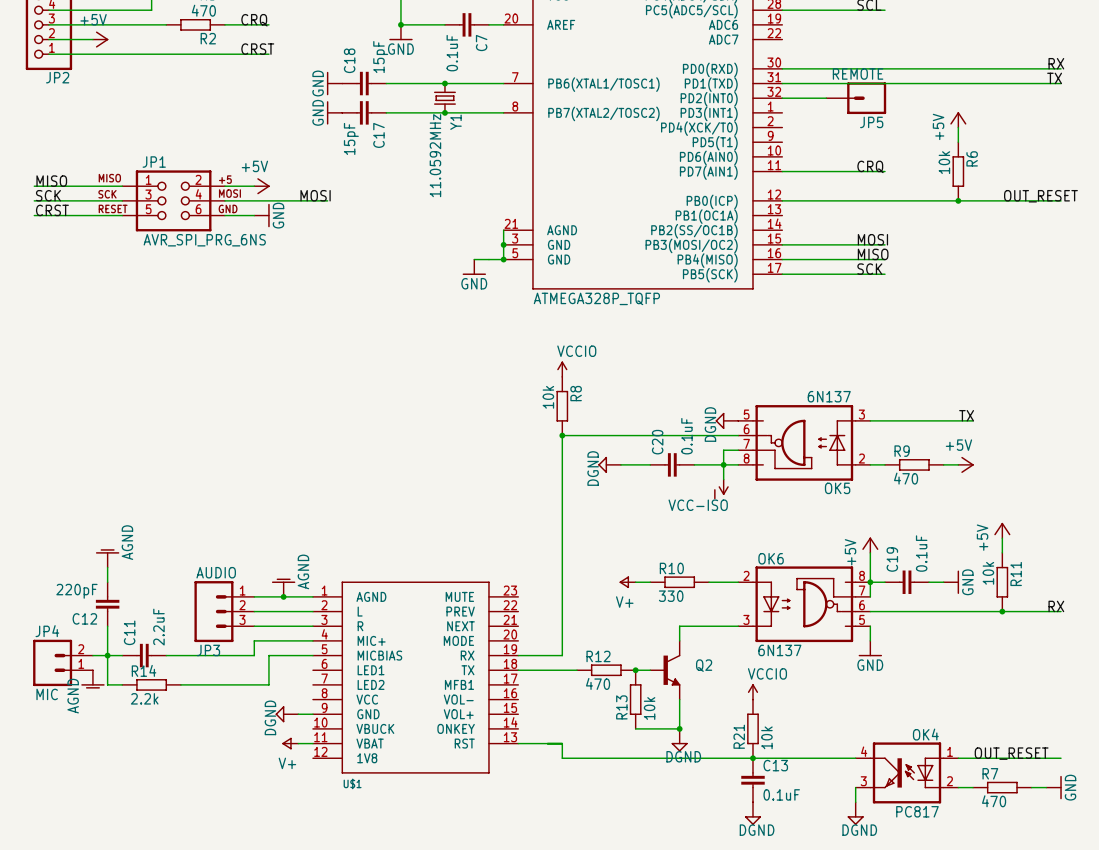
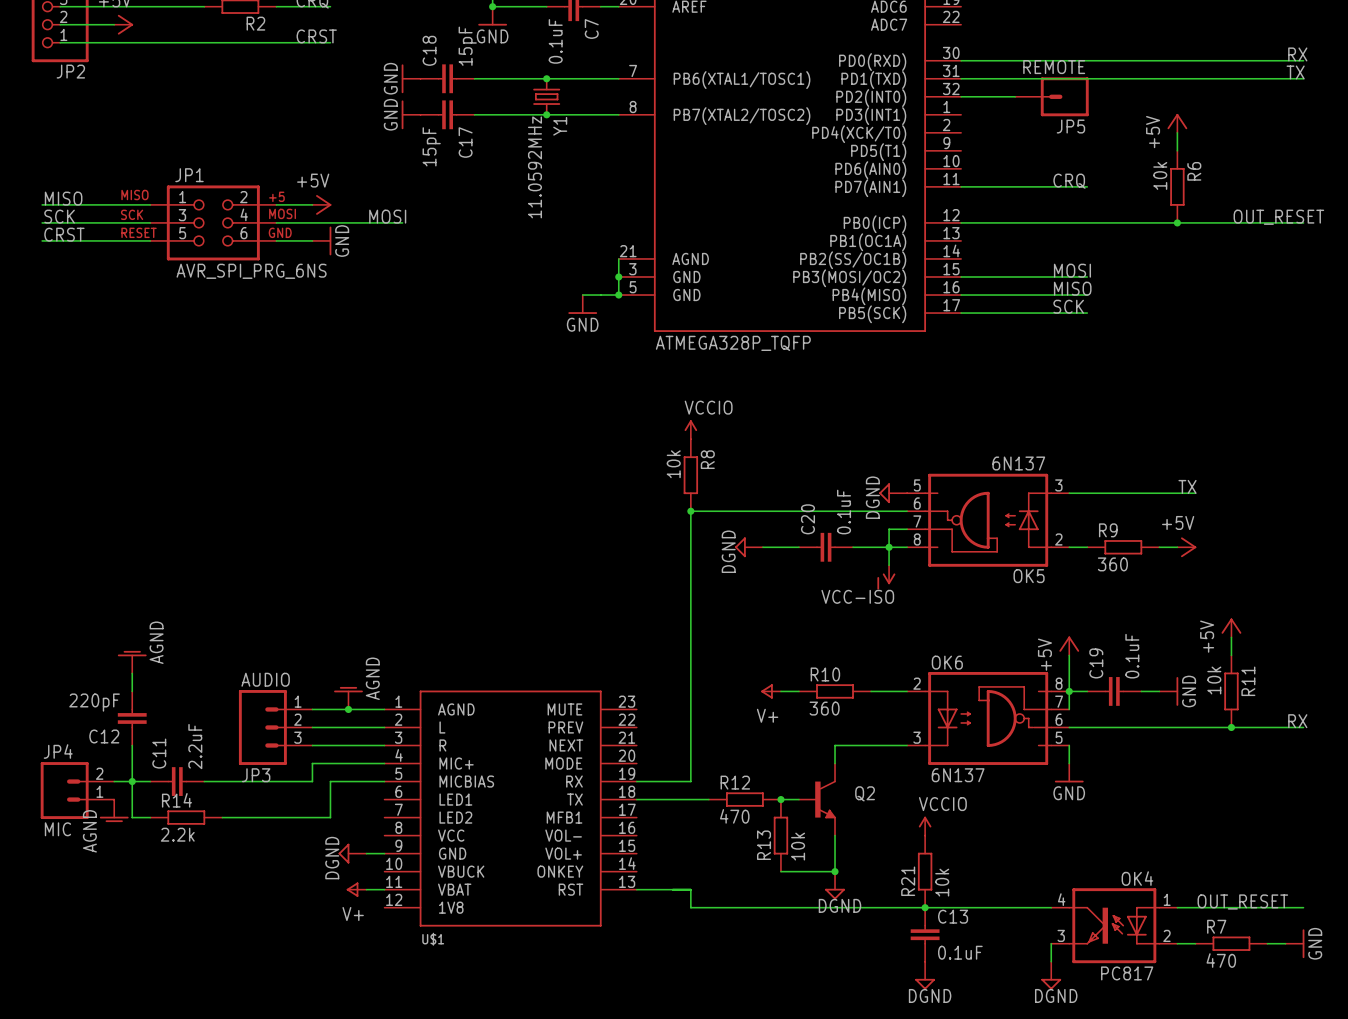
R9 value: 470 (906, 478) -> 360 (1112, 564)
R10 value: 330 (671, 596) -> 360 (824, 708)

